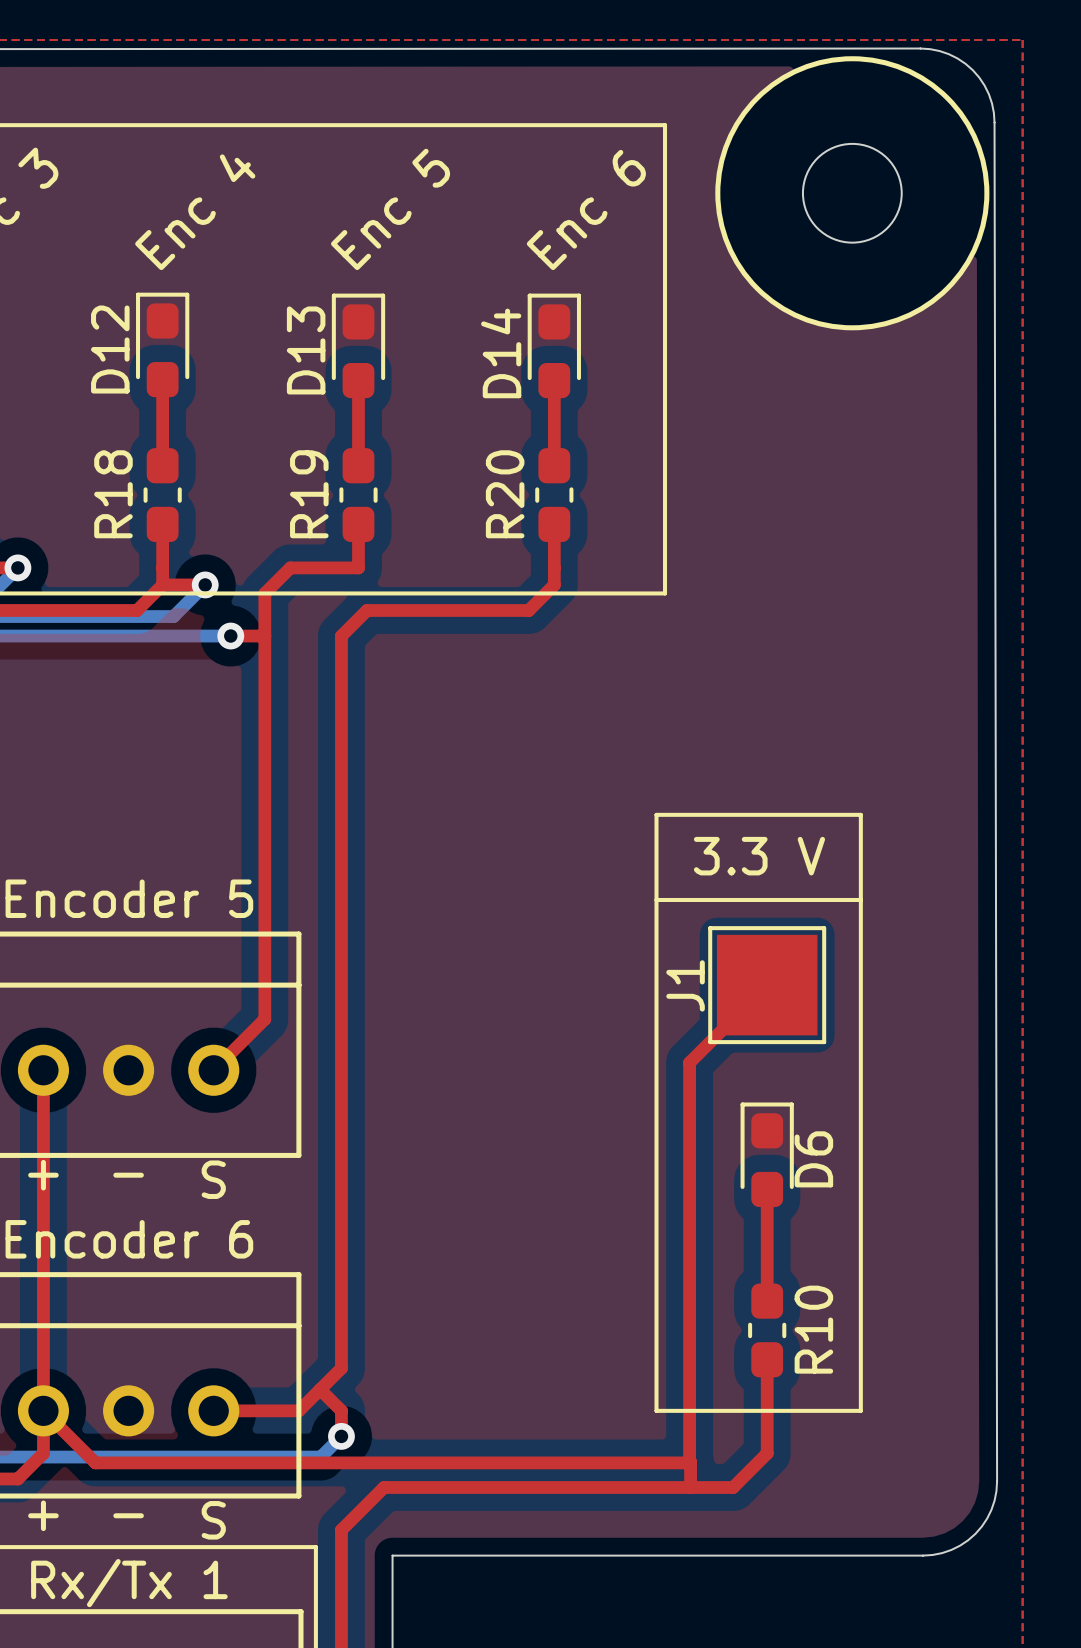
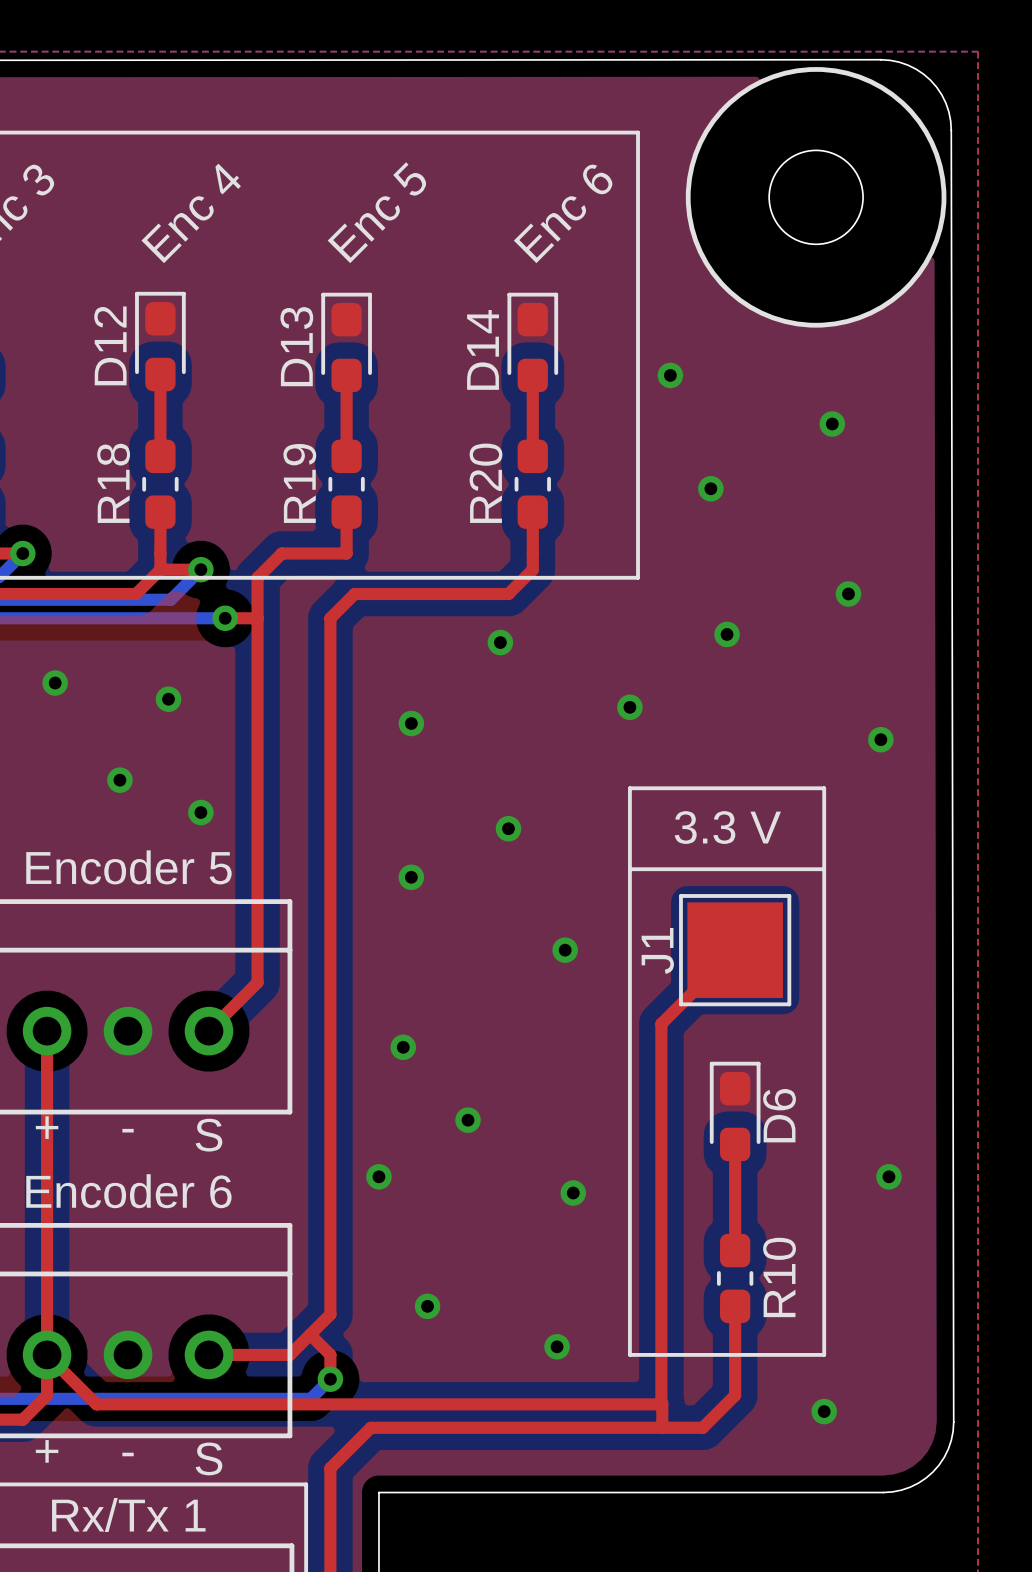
via: none -> (670, 375)
via: none -> (832, 424)
via: none -> (710, 488)
via: none -> (848, 593)
via: none -> (727, 634)
via: none -> (500, 642)
via: none -> (55, 683)
via: none -> (168, 699)
via: none -> (629, 707)
via: none -> (411, 723)
via: none -> (880, 739)
via: none -> (119, 780)
via: none -> (200, 812)
via: none -> (508, 828)
via: none -> (411, 877)
via: none -> (565, 950)
via: none -> (403, 1047)
via: none -> (468, 1120)
via: none -> (378, 1176)
via: none -> (888, 1176)
via: none -> (573, 1193)
via: none -> (427, 1306)
via: none -> (557, 1346)
via: none -> (824, 1411)

